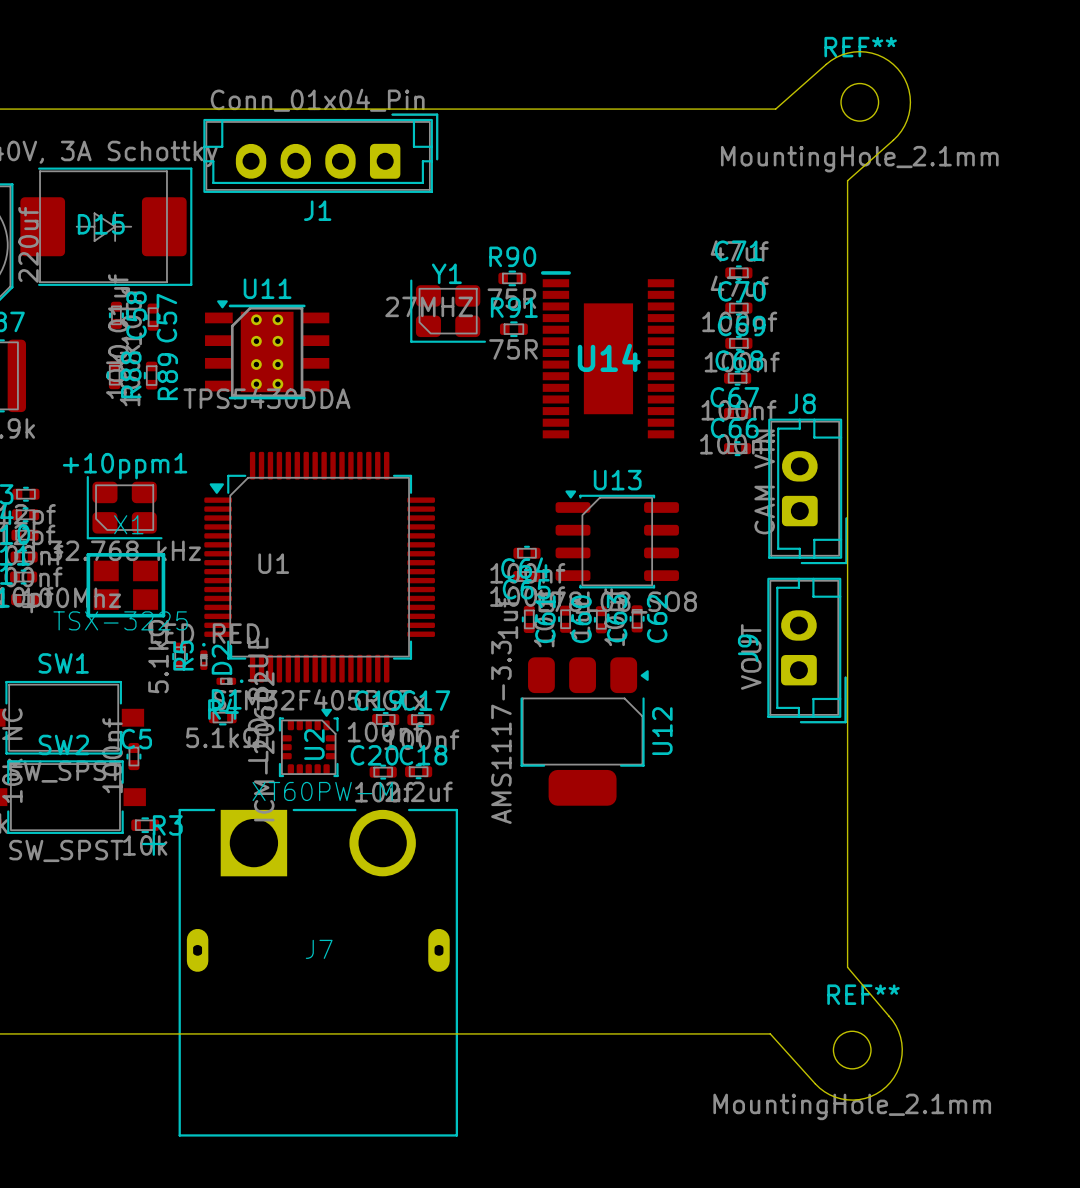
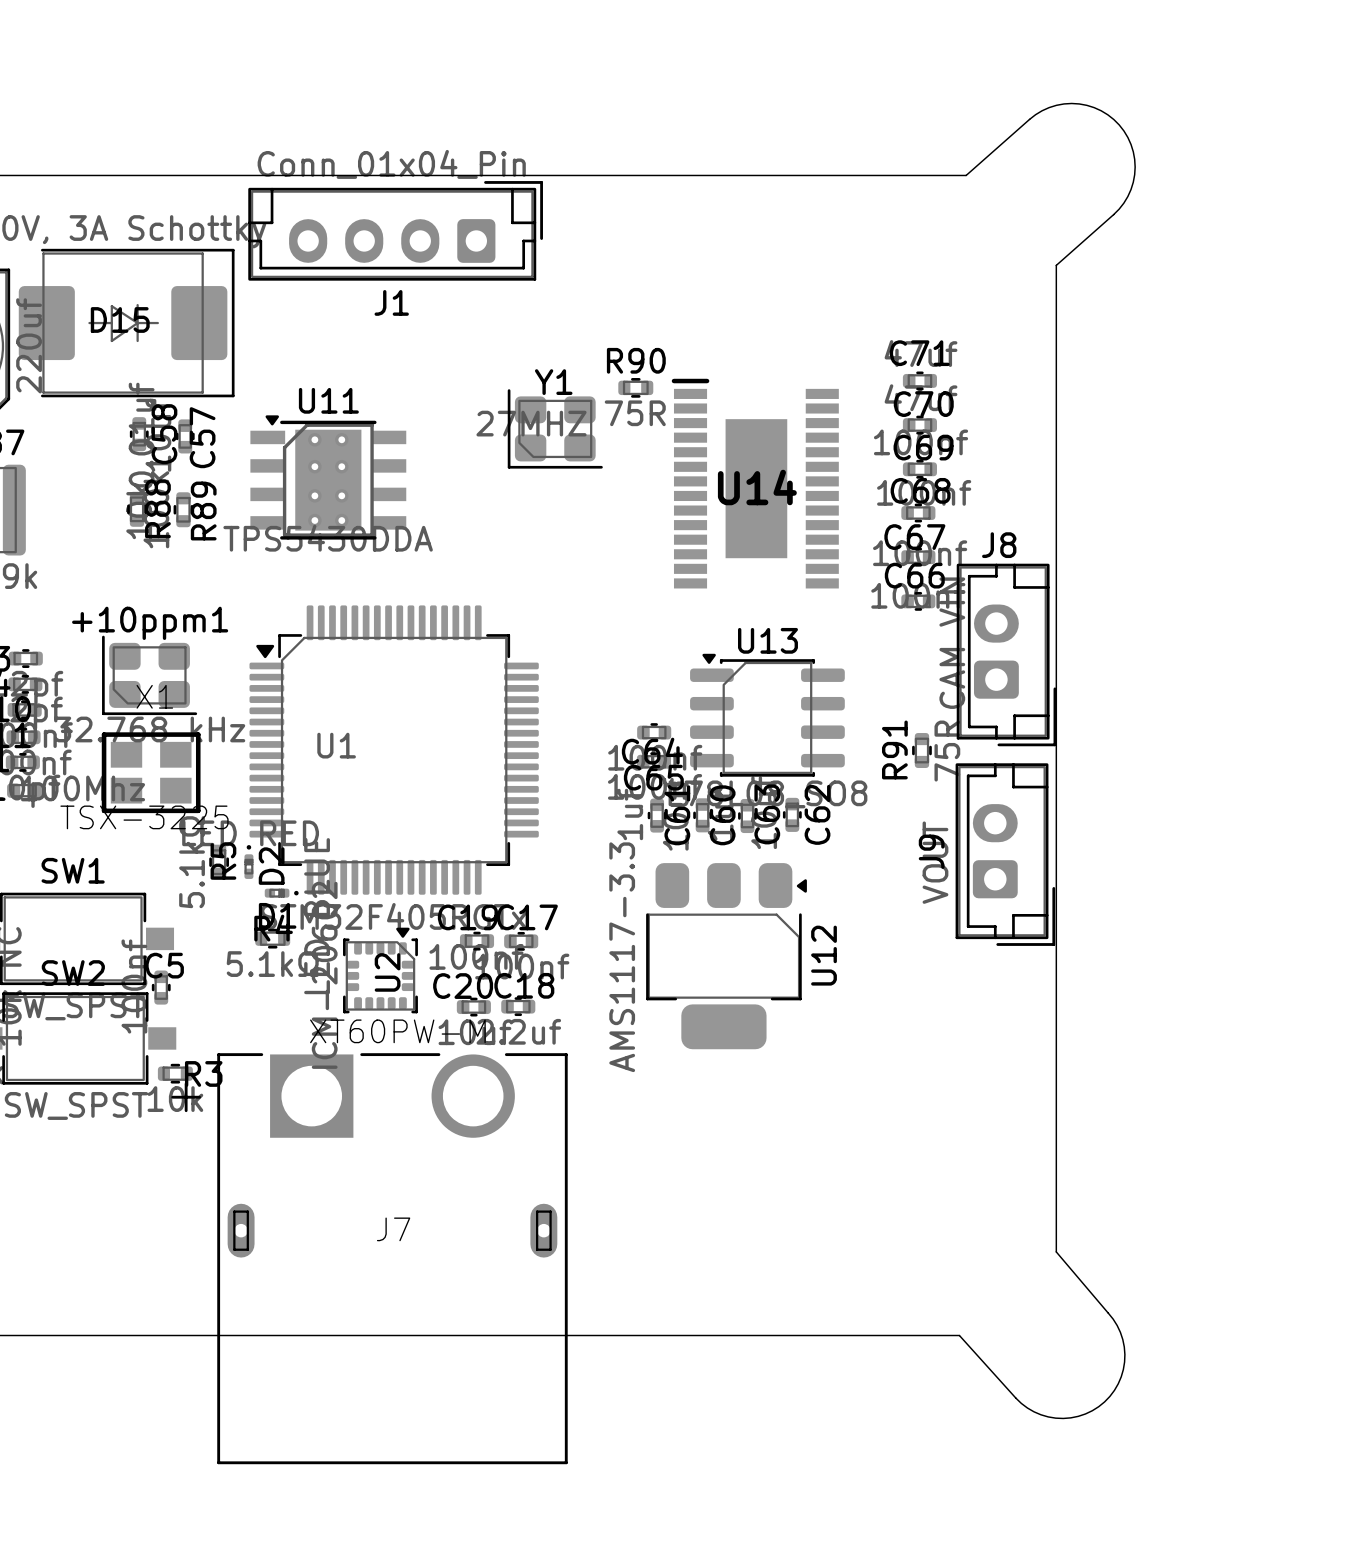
REF**: MountingHole_2.1mm (859, 102) -> none
R91 rotation: 0° (513, 329) -> 90° clockwise (921, 750)
R91 position: (513, 329) -> (921, 750)
REF**: MountingHole_2.1mm (852, 1050) -> none

